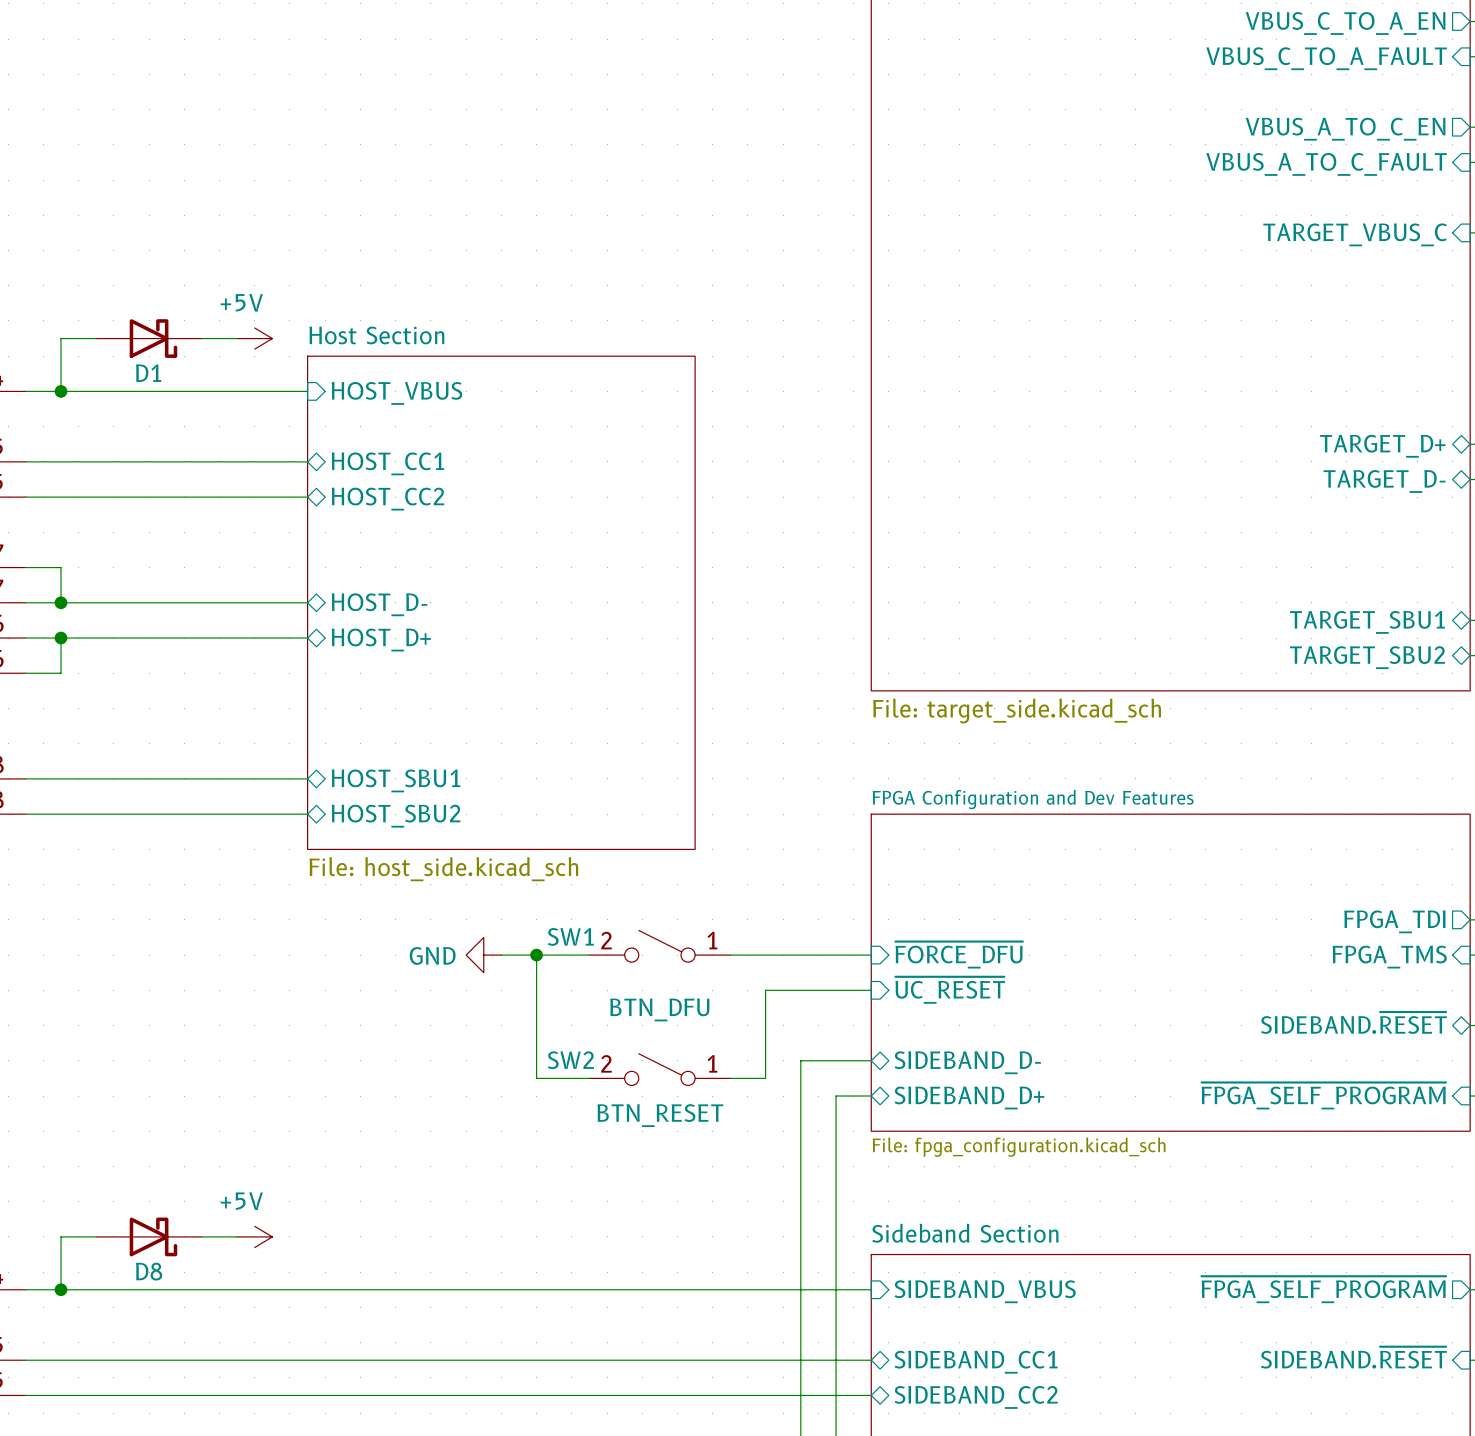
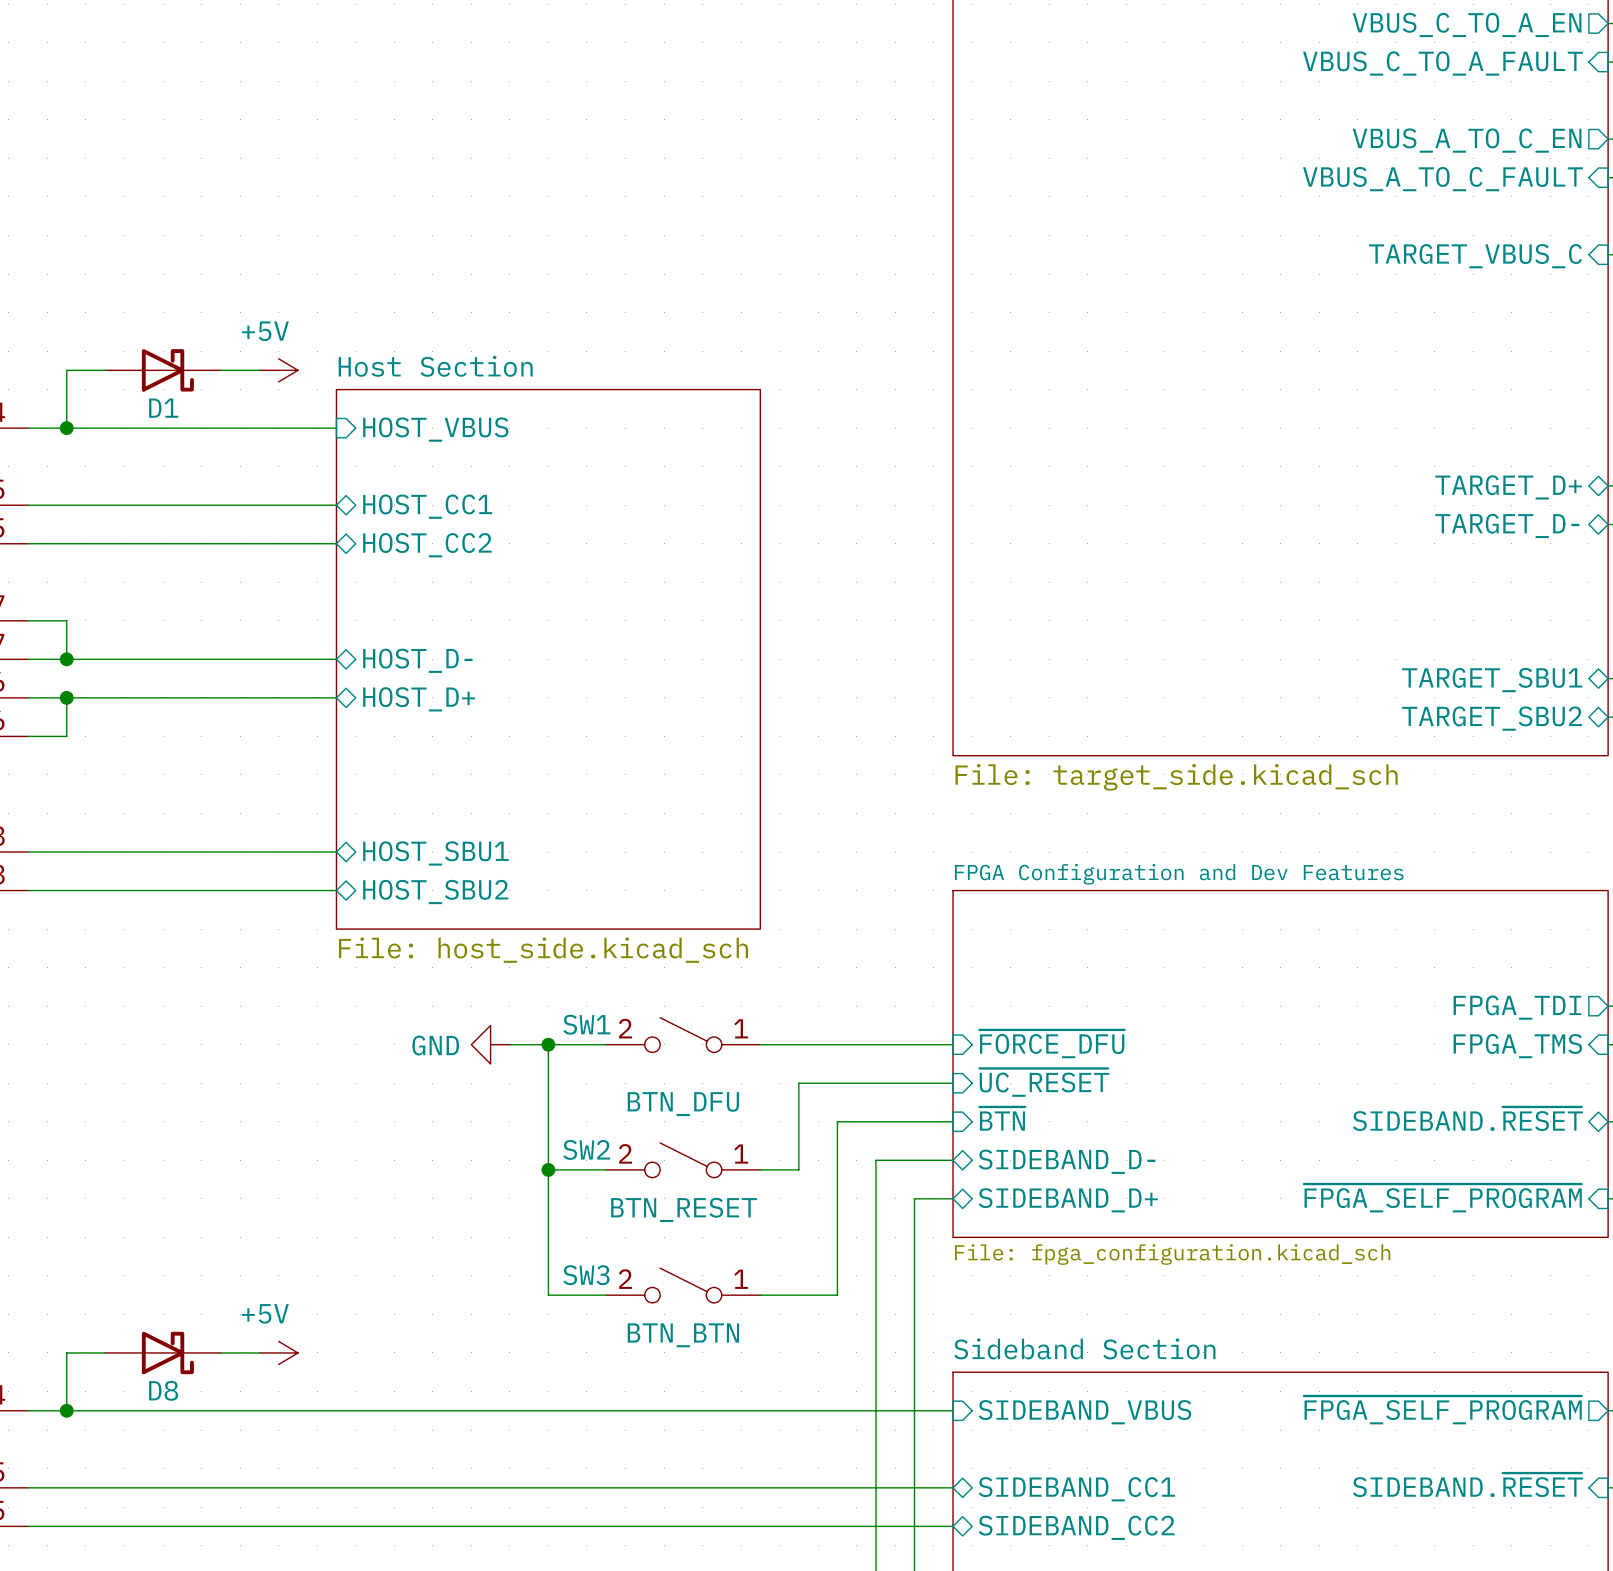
SW1 position: (659, 946) -> (683, 1035)
wire: none -> (509, 1044) (548, 1044) (548, 1295) (606, 1295)
power symbol position: GND (483, 955) -> GND (490, 1044)
wire: (536, 955) (536, 1078) (589, 1078) -> none
junction position: (536, 955) -> (548, 1044)
wire: (765, 990) (765, 1025) -> (837, 1083) (798, 1083) (798, 1169) (760, 1169)
sheet pin: none -> ~{BTN} (1002, 1118)
wire: none -> (837, 1121) (953, 1121)
wire: none -> (548, 1169) (606, 1169)
junction: none -> (548, 1169)
SW2 position: (659, 1069) -> (683, 1160)
wire: (730, 1078) (765, 1078) -> (760, 1295) (837, 1295) (837, 1179)
SW3: none -> BTN_BTN (683, 1285)

